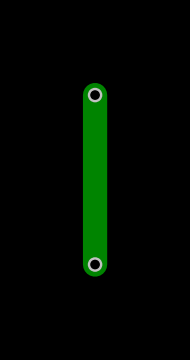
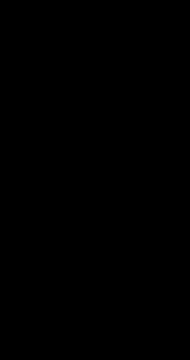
track: (95, 95) (95, 264) -> none
via: (95, 95) -> none
via: (95, 264) -> none

